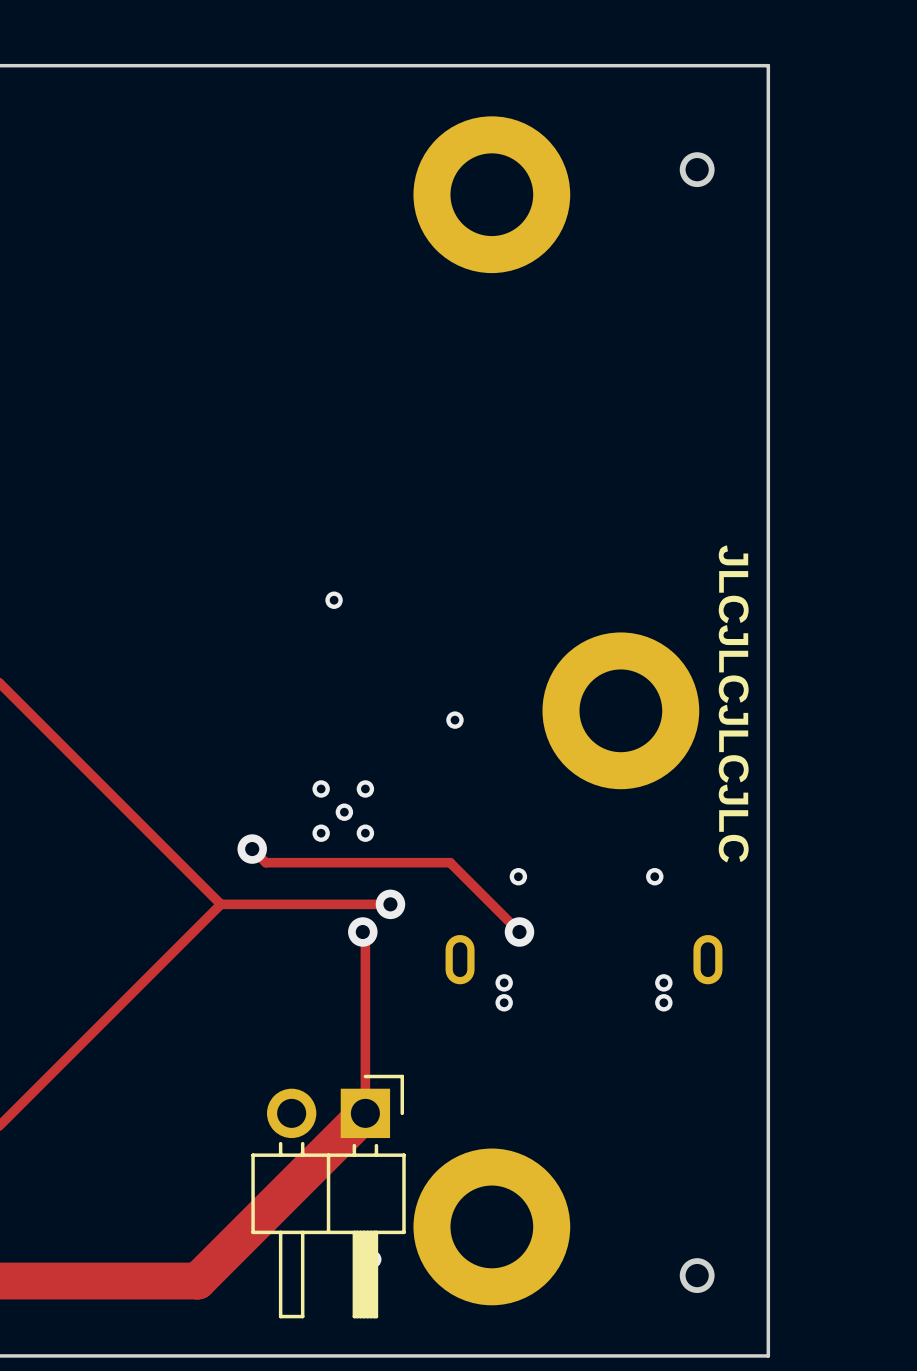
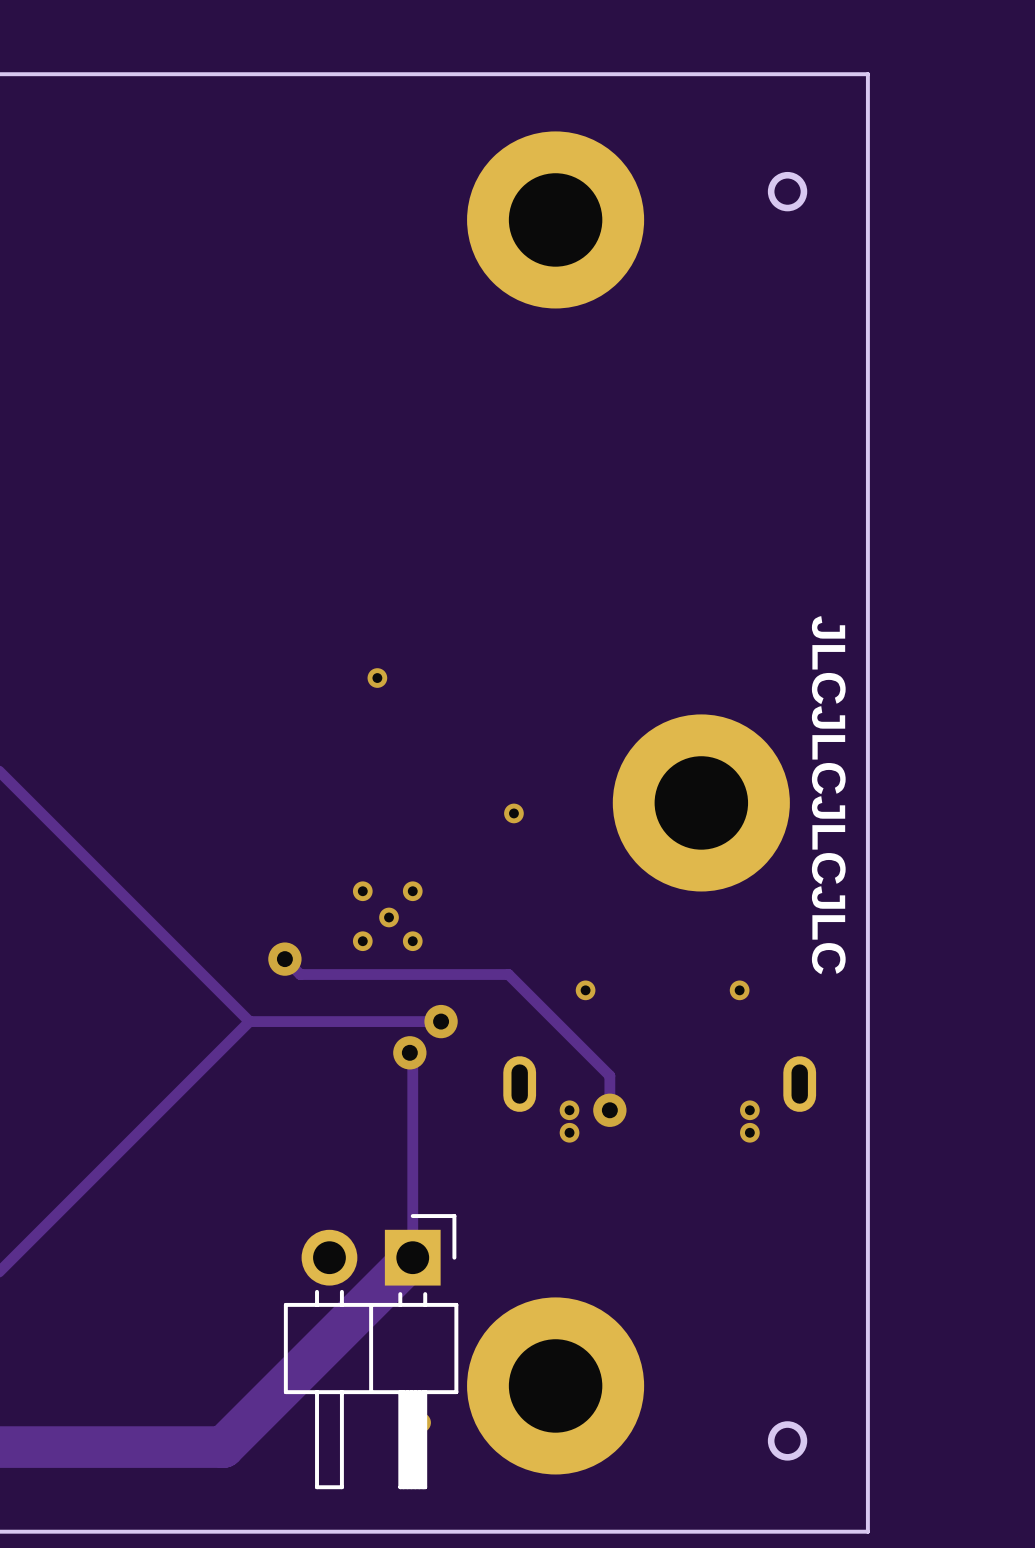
track: none -> (586, 1052) (609, 1075) (609, 1110)
via position: (519, 932) -> (609, 1110)

